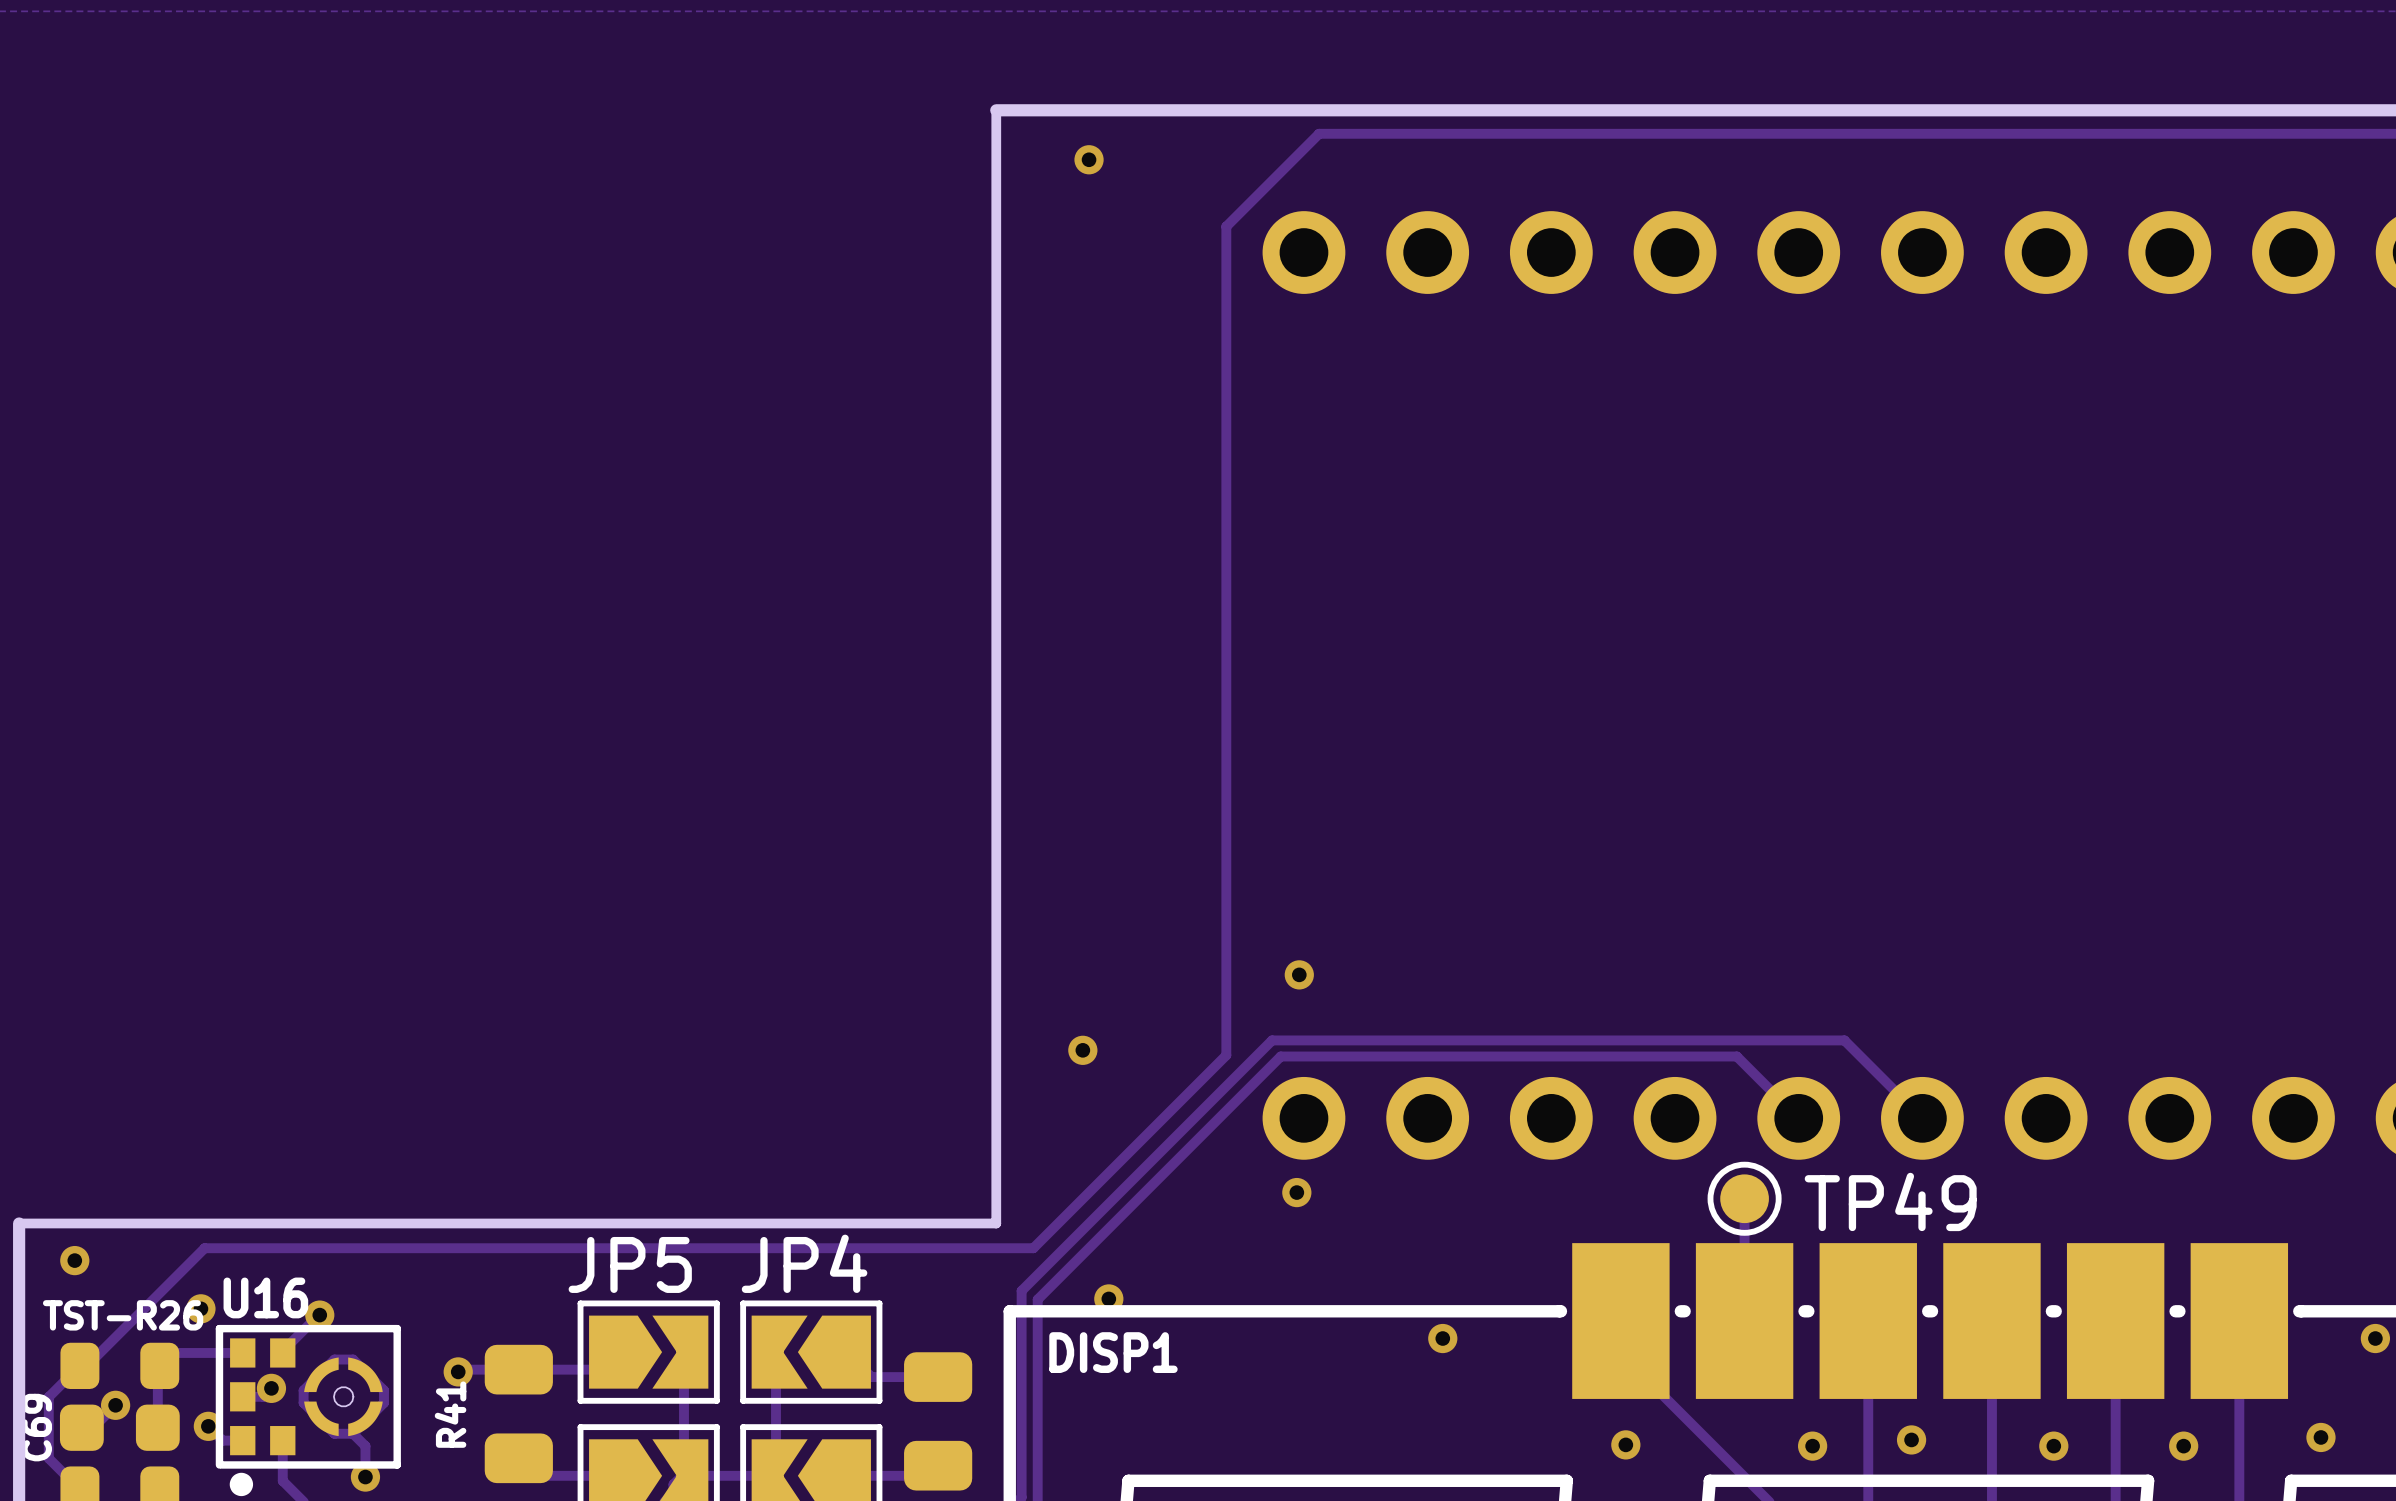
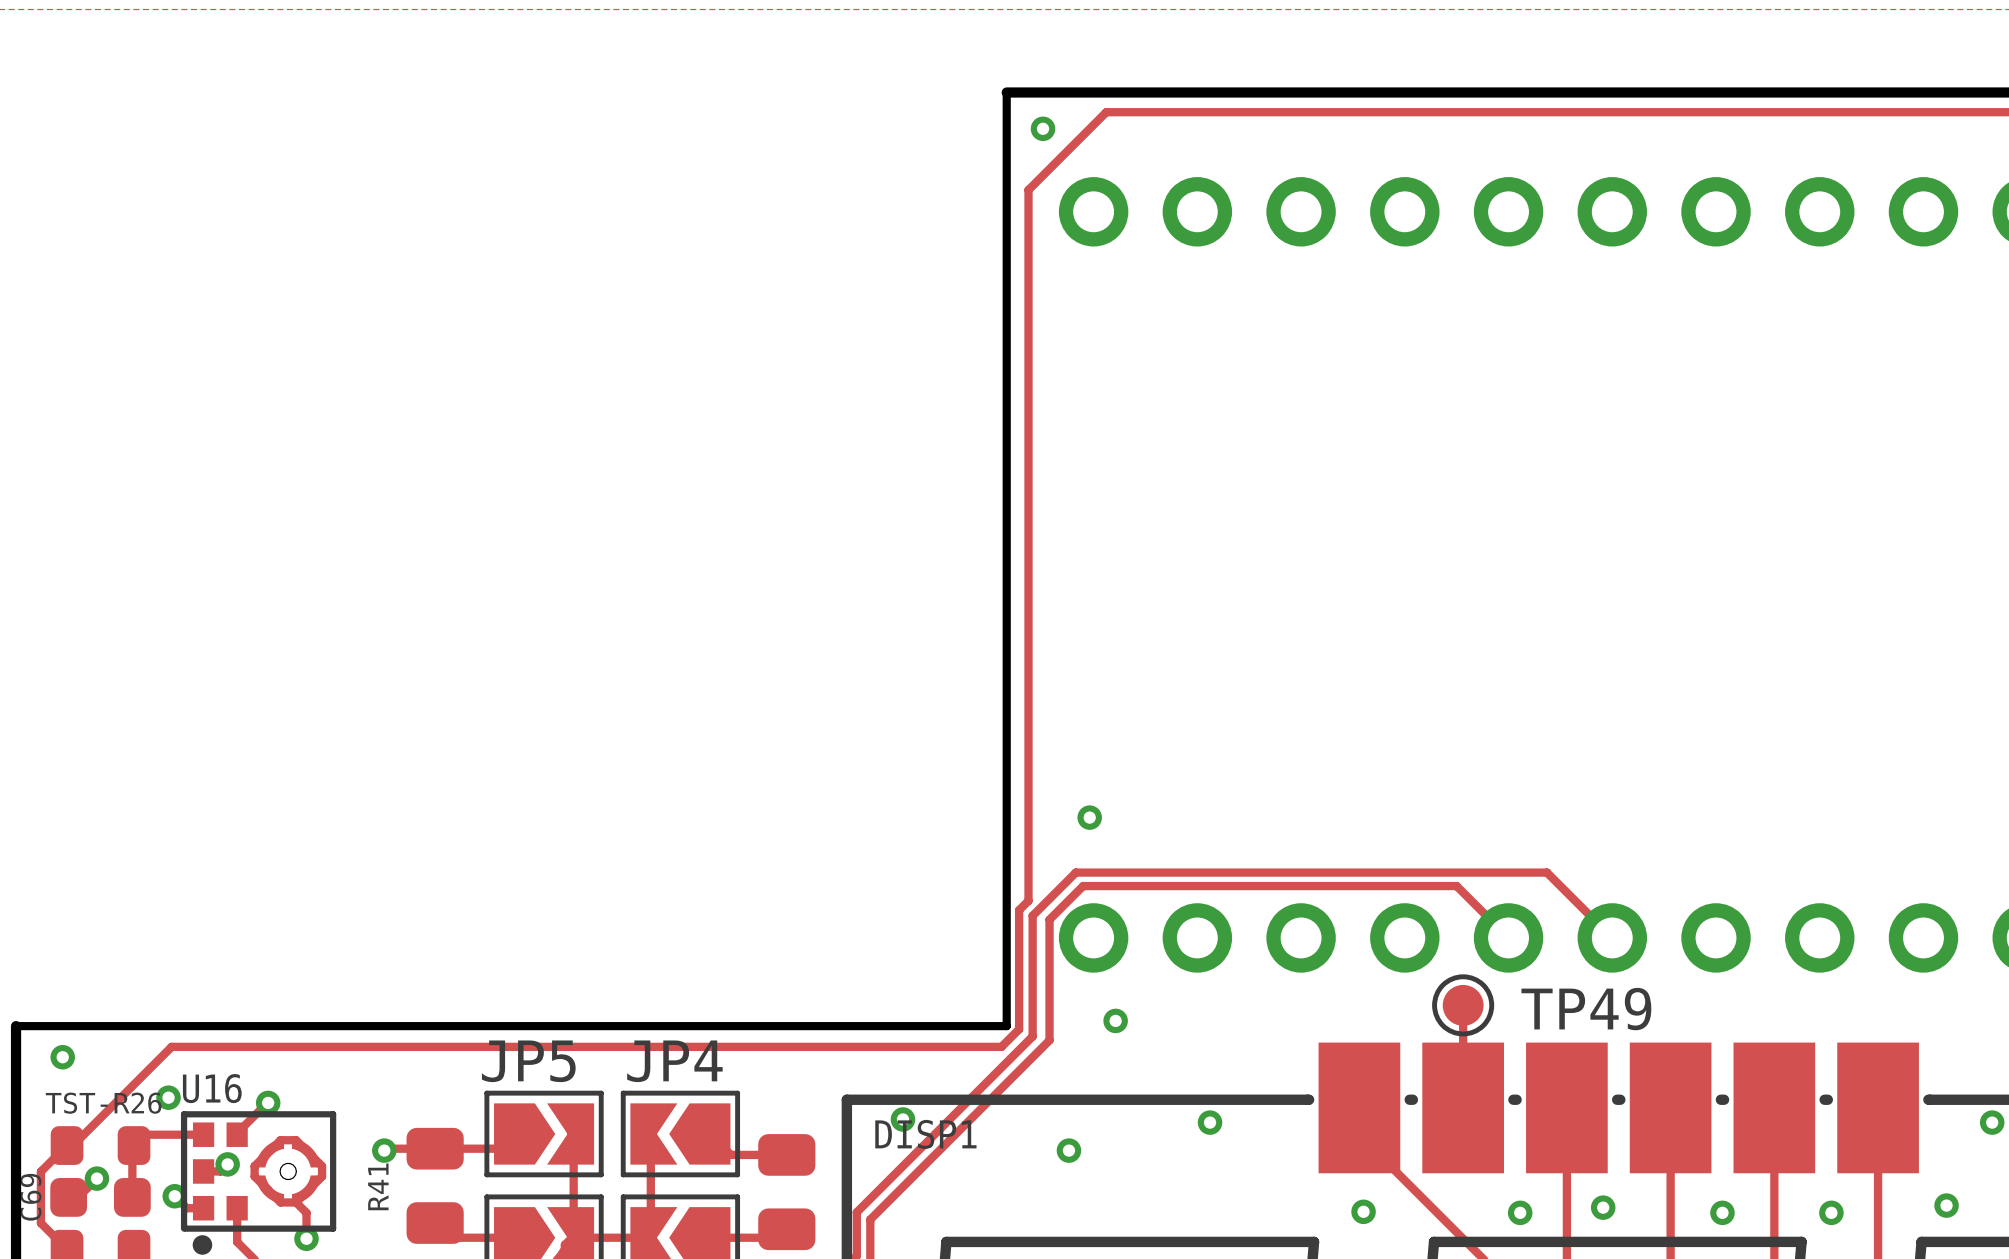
board edge: (1200, 110) (996, 110) (996, 1223) -> (1006, 92) (1006, 1026) (835, 1026)
via position: (1089, 159) -> (1043, 128)
track: (1282, 1040) (1272, 1040) (1021, 1290) (1021, 1445) -> (1075, 872) (1032, 915) (1032, 1036) (856, 1212)
via: (1082, 1050) -> none
track: (1226, 1055) (1033, 1248) -> (1028, 885) (1028, 900) (1019, 910) (1019, 1029) (1001, 1046) (866, 1046)
track: (1291, 1056) (1280, 1056) (1037, 1299) (1037, 1454) -> (1083, 886) (1049, 919) (1049, 1040) (870, 1219)
via position: (1296, 1192) -> (1115, 1020)
via position: (1108, 1298) -> (902, 1119)
via: none -> (1068, 1150)

